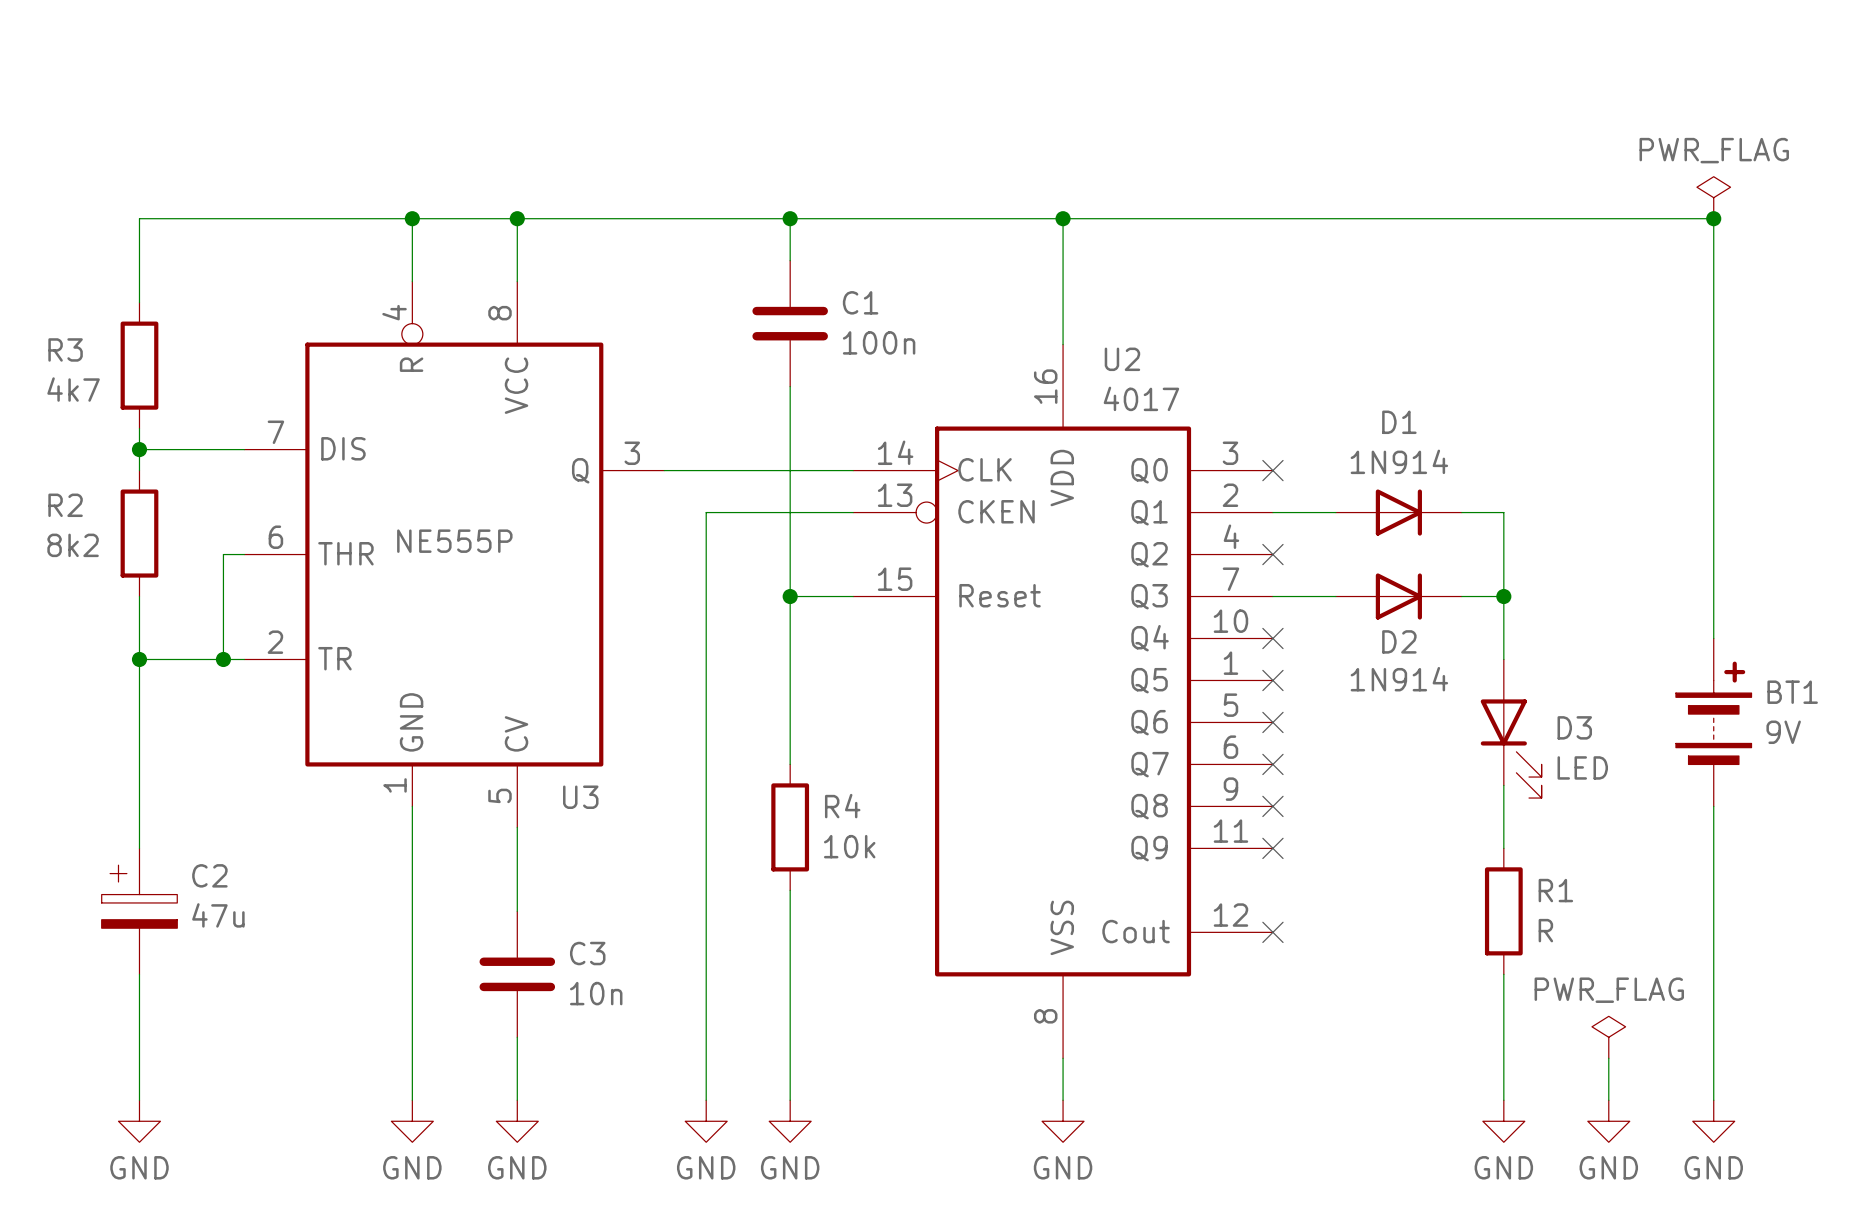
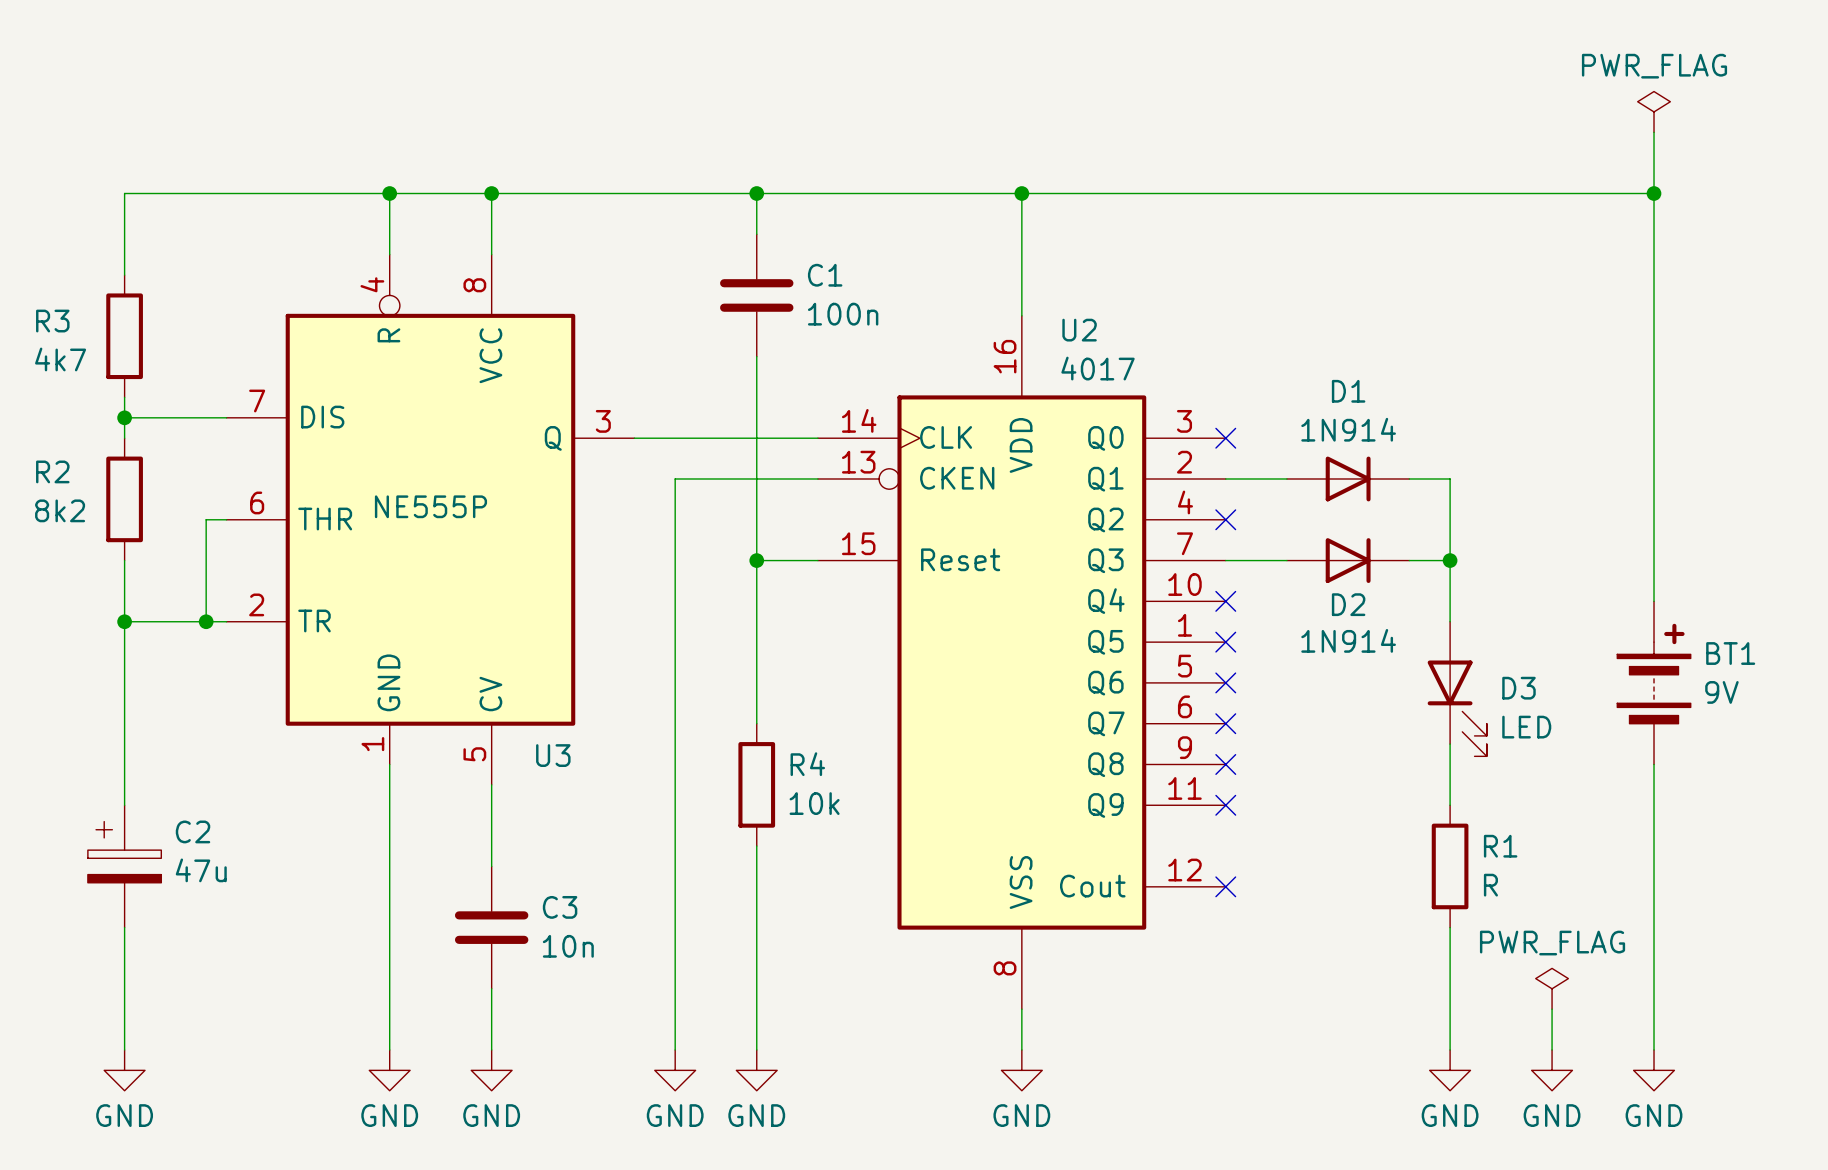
wire: none -> (1654, 132) (1654, 193)
power symbol position: PWR_FLAG (1713, 197) -> PWR_FLAG (1654, 111)

